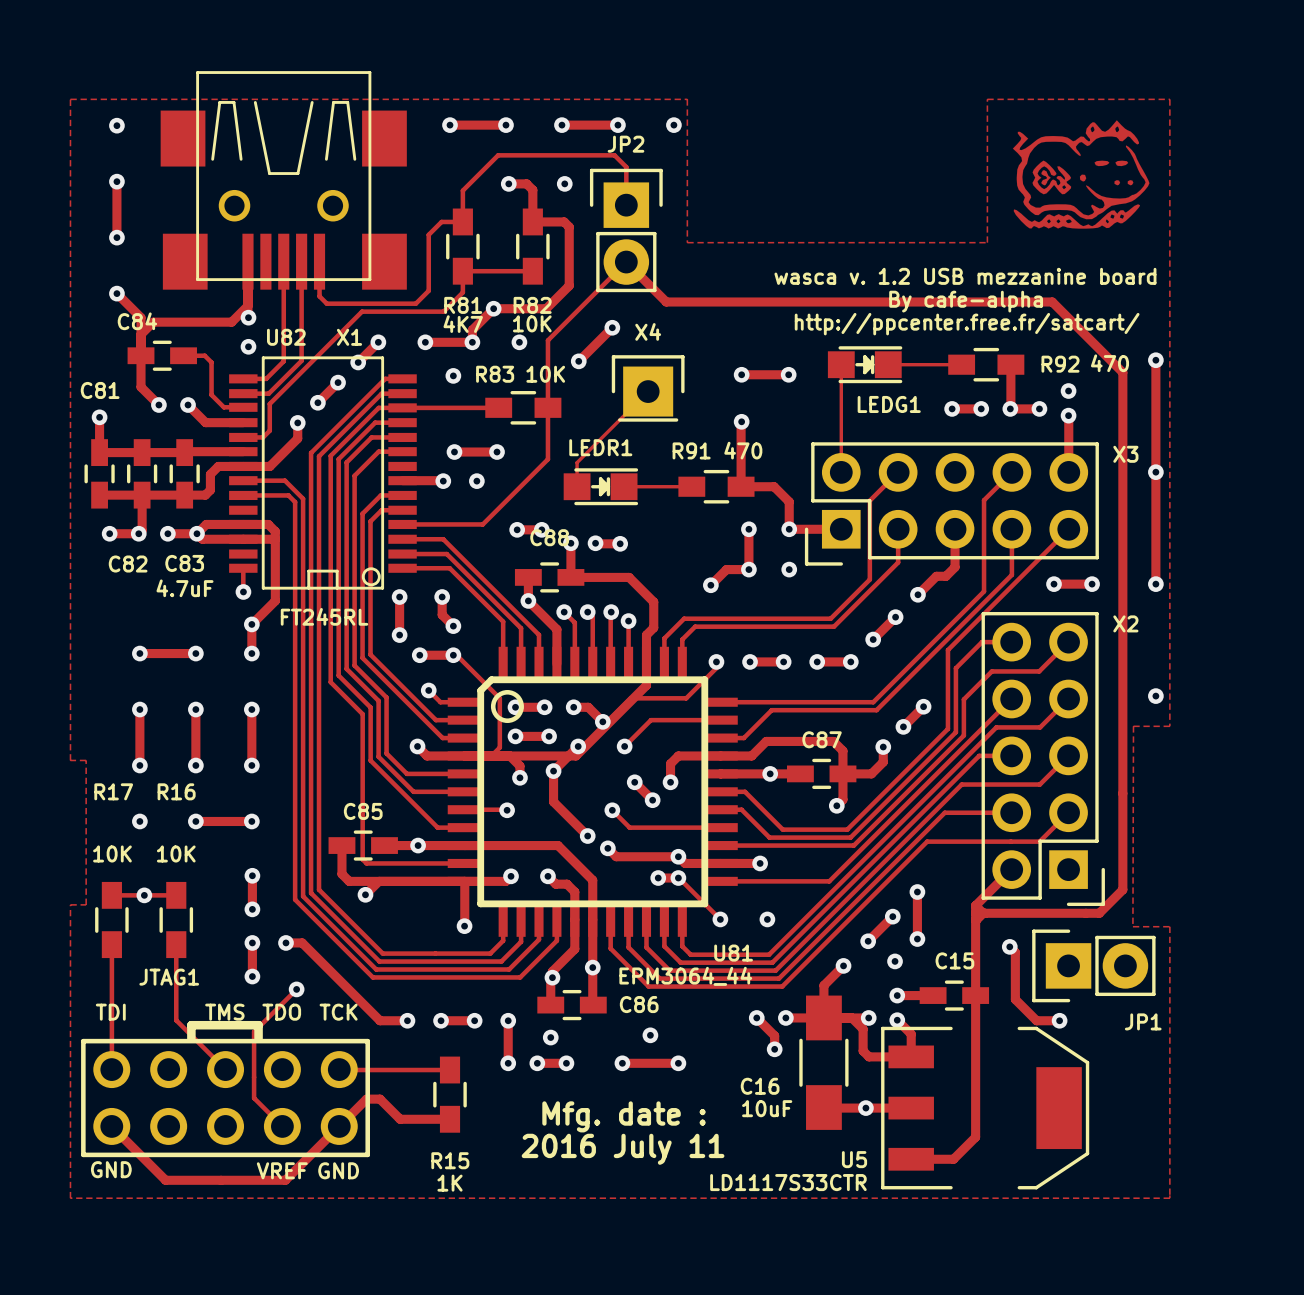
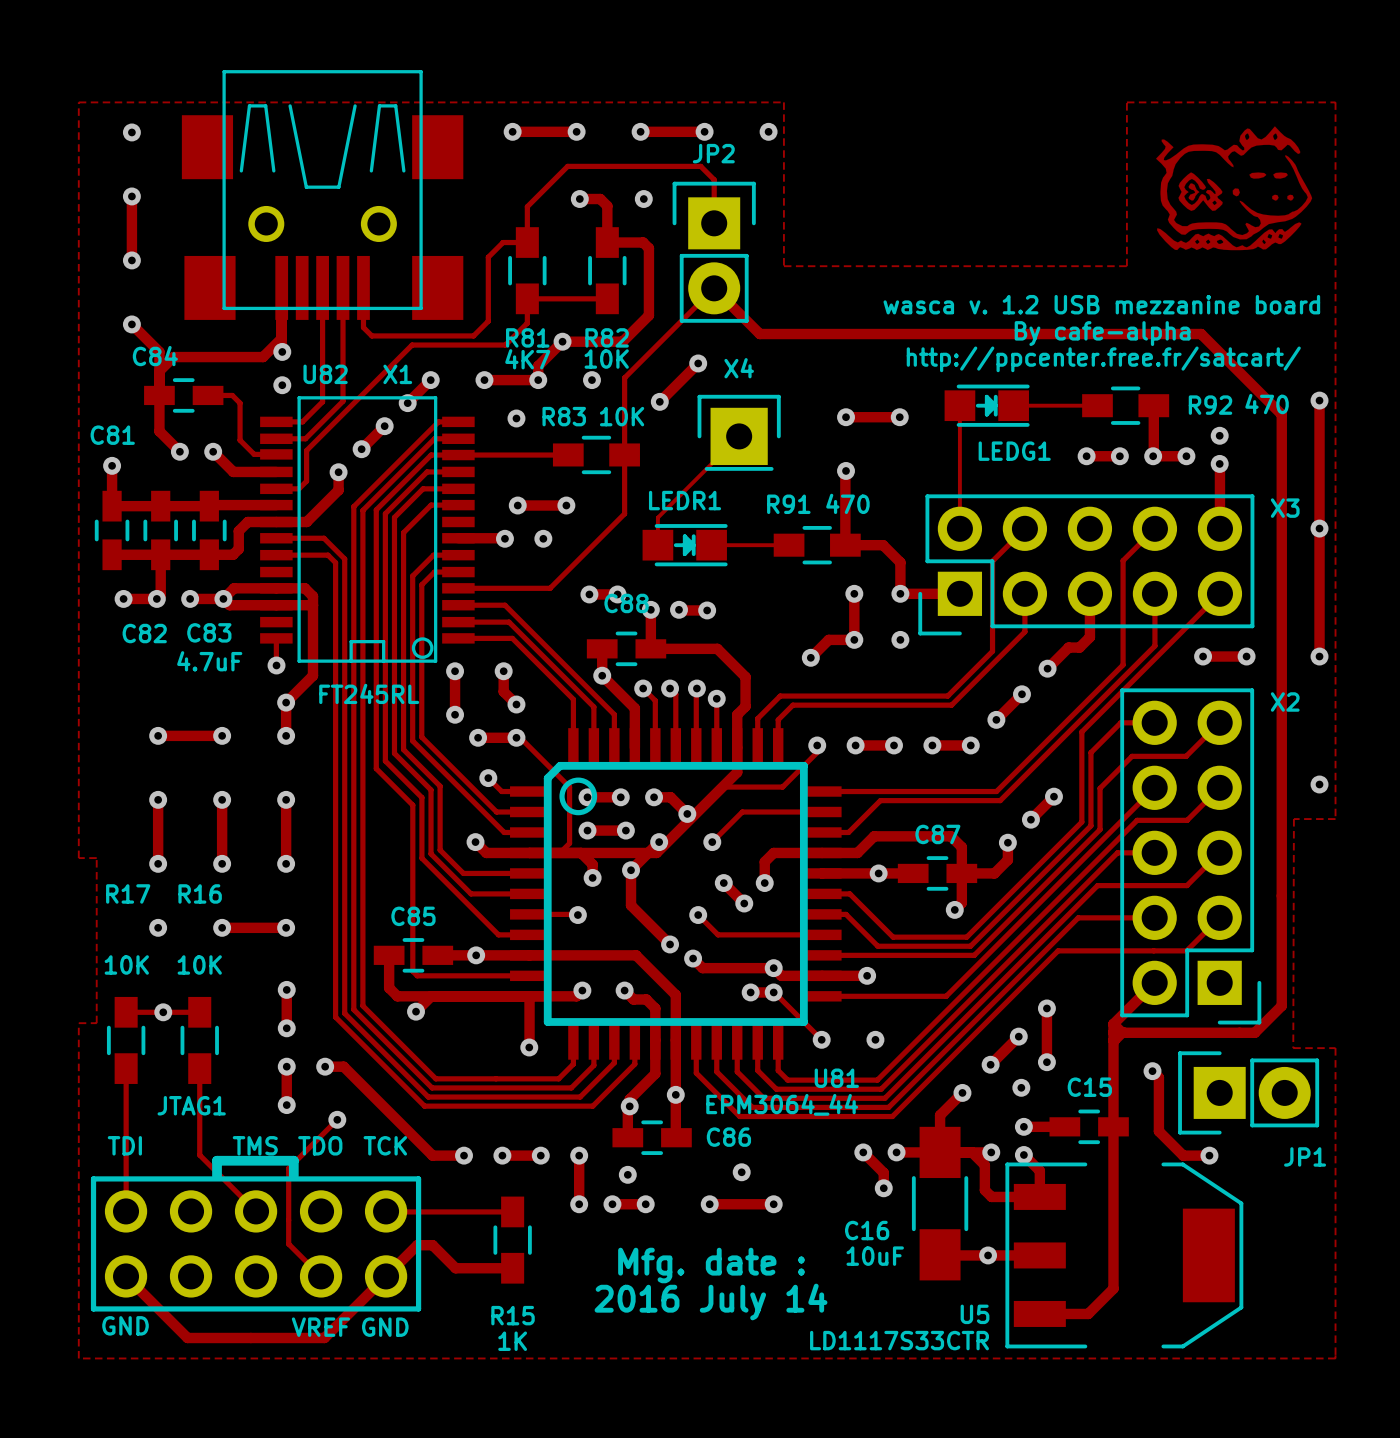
text: 2016 July 11 (623, 1149) -> 2016 July 14 (711, 1302)

